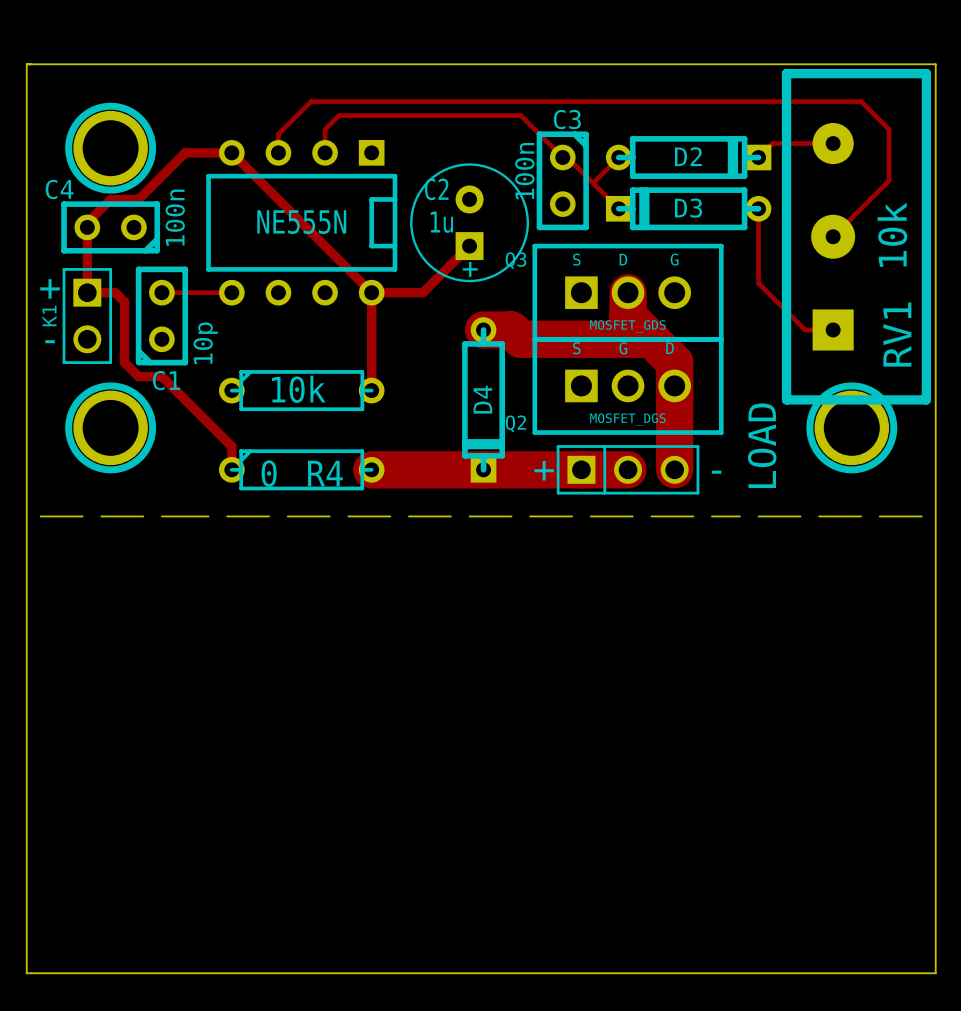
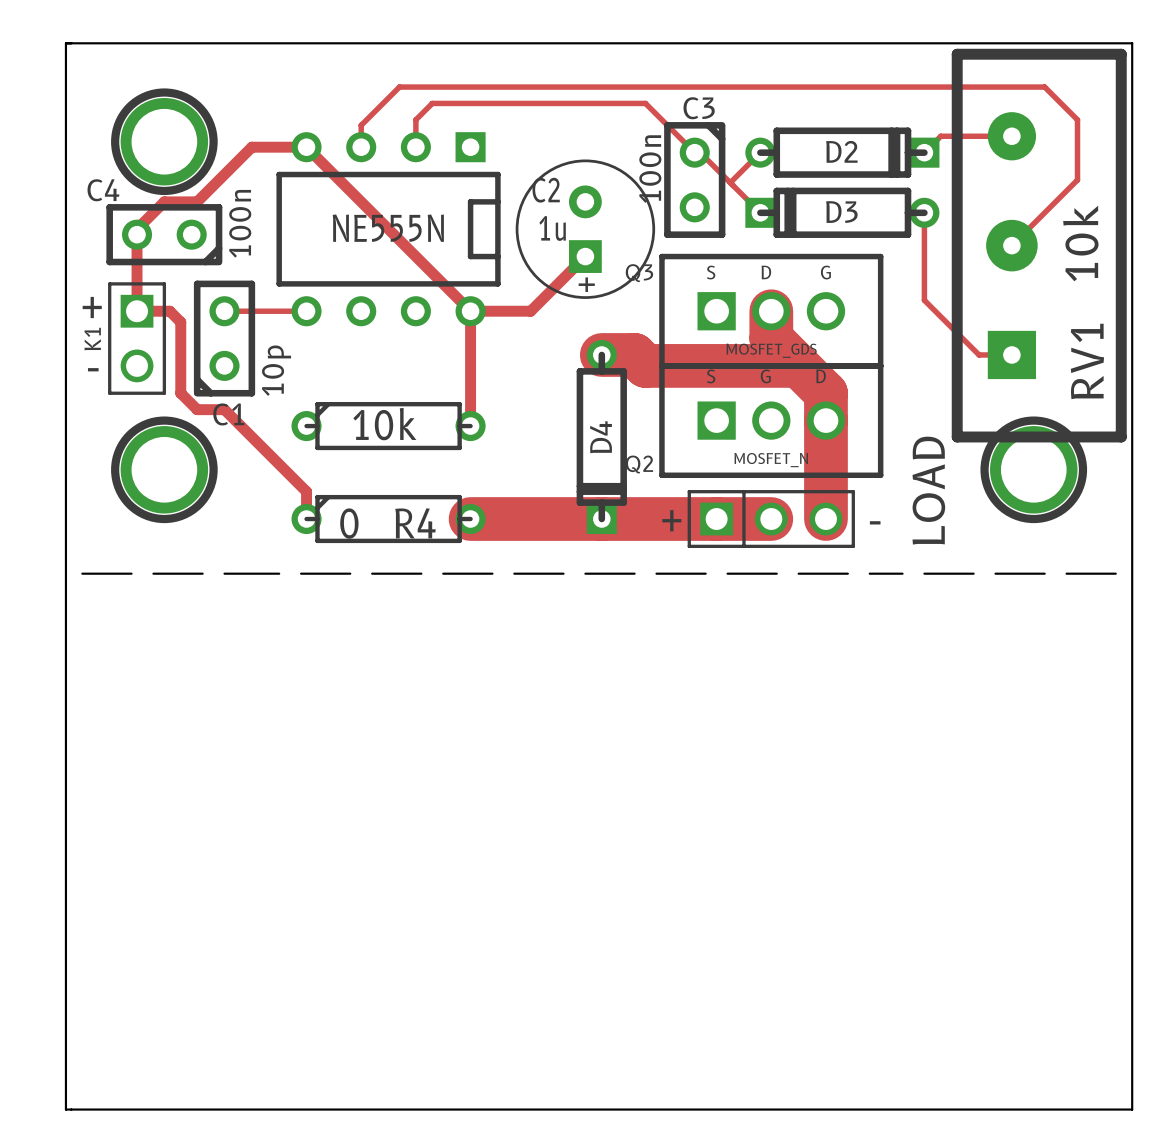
Q2 value: MOSFET_DGS (627, 419) -> MOSFET_N (771, 460)

